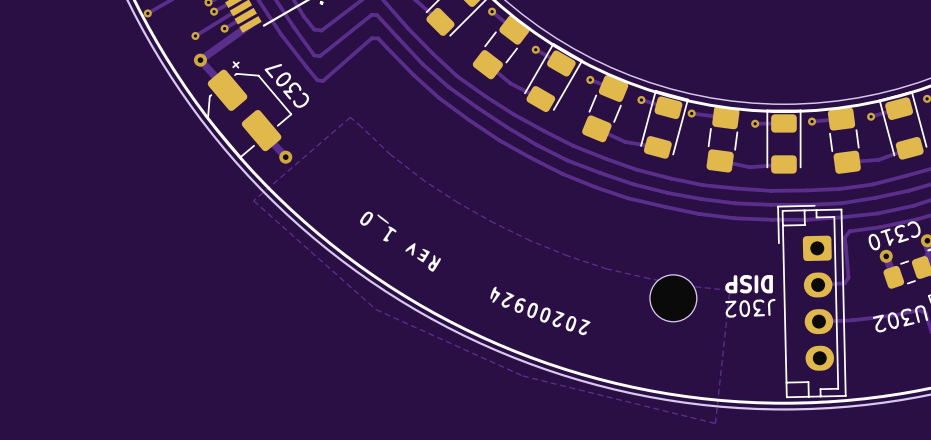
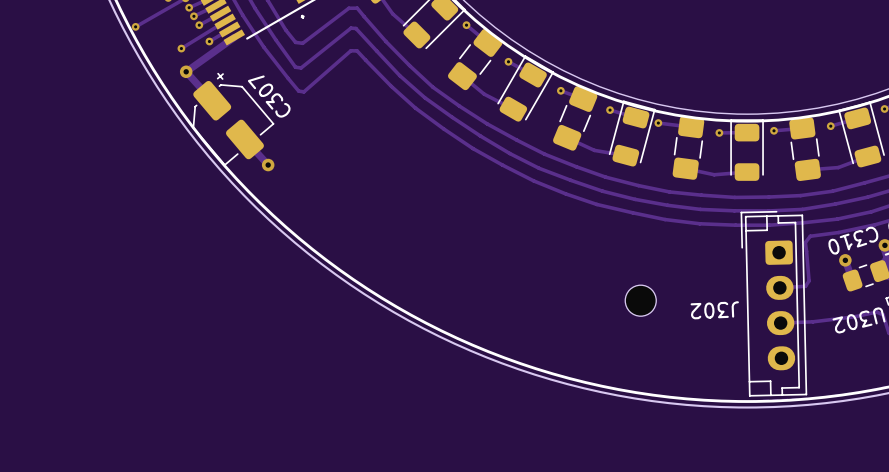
zone outline: (350, 117) (390, 154) (424, 181) (458, 202) (530, 240) (606, 269) (688, 286) (729, 290) (715, 423) (522, 375) (376, 309) (253, 200) (350, 117) -> none
drawing: [360, 211, 591, 336] -> none
part footprint: [649, 274, 697, 322] -> [625, 285, 657, 317]
text: DISP (749, 284) -> none

